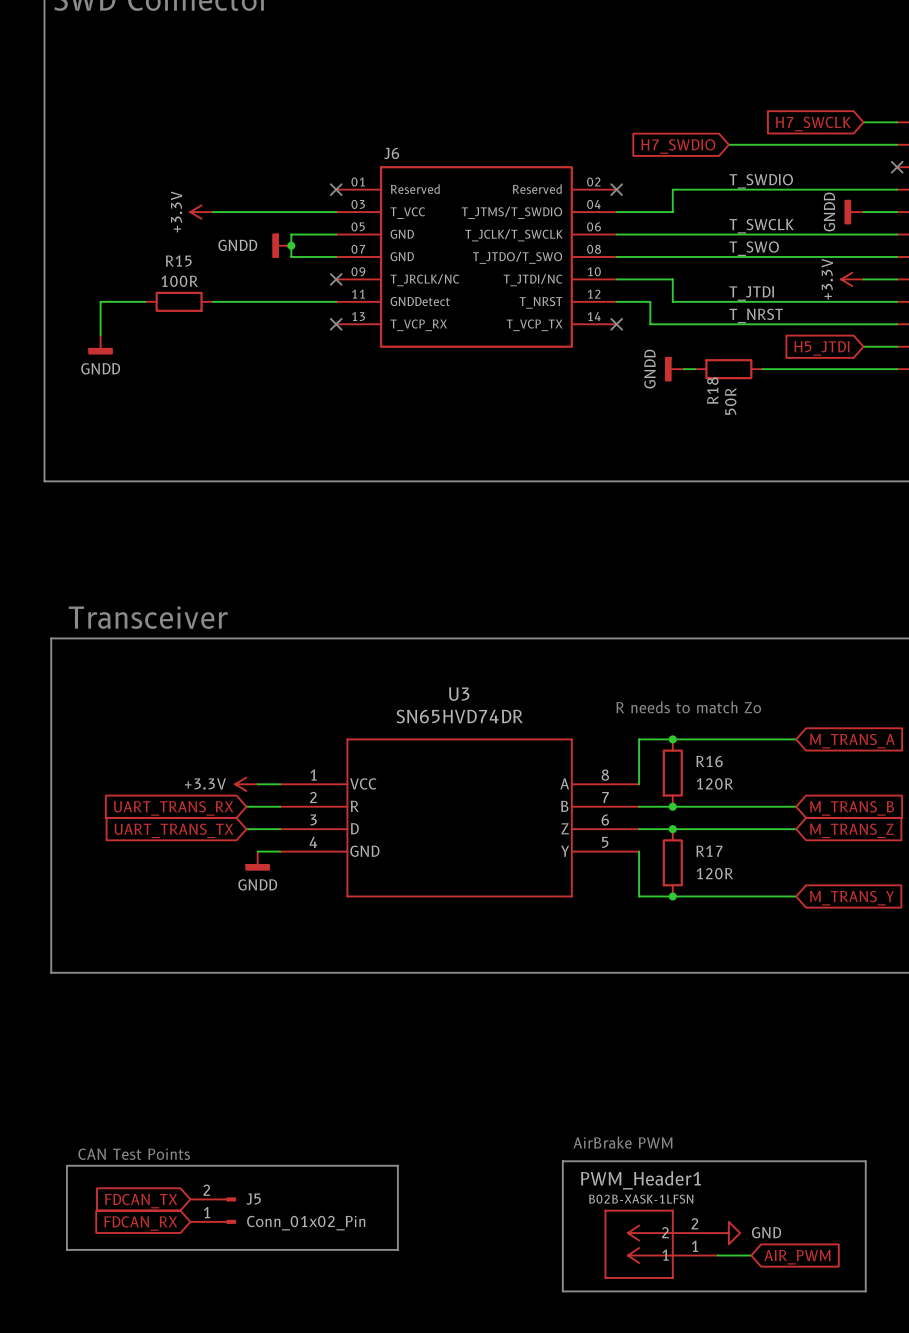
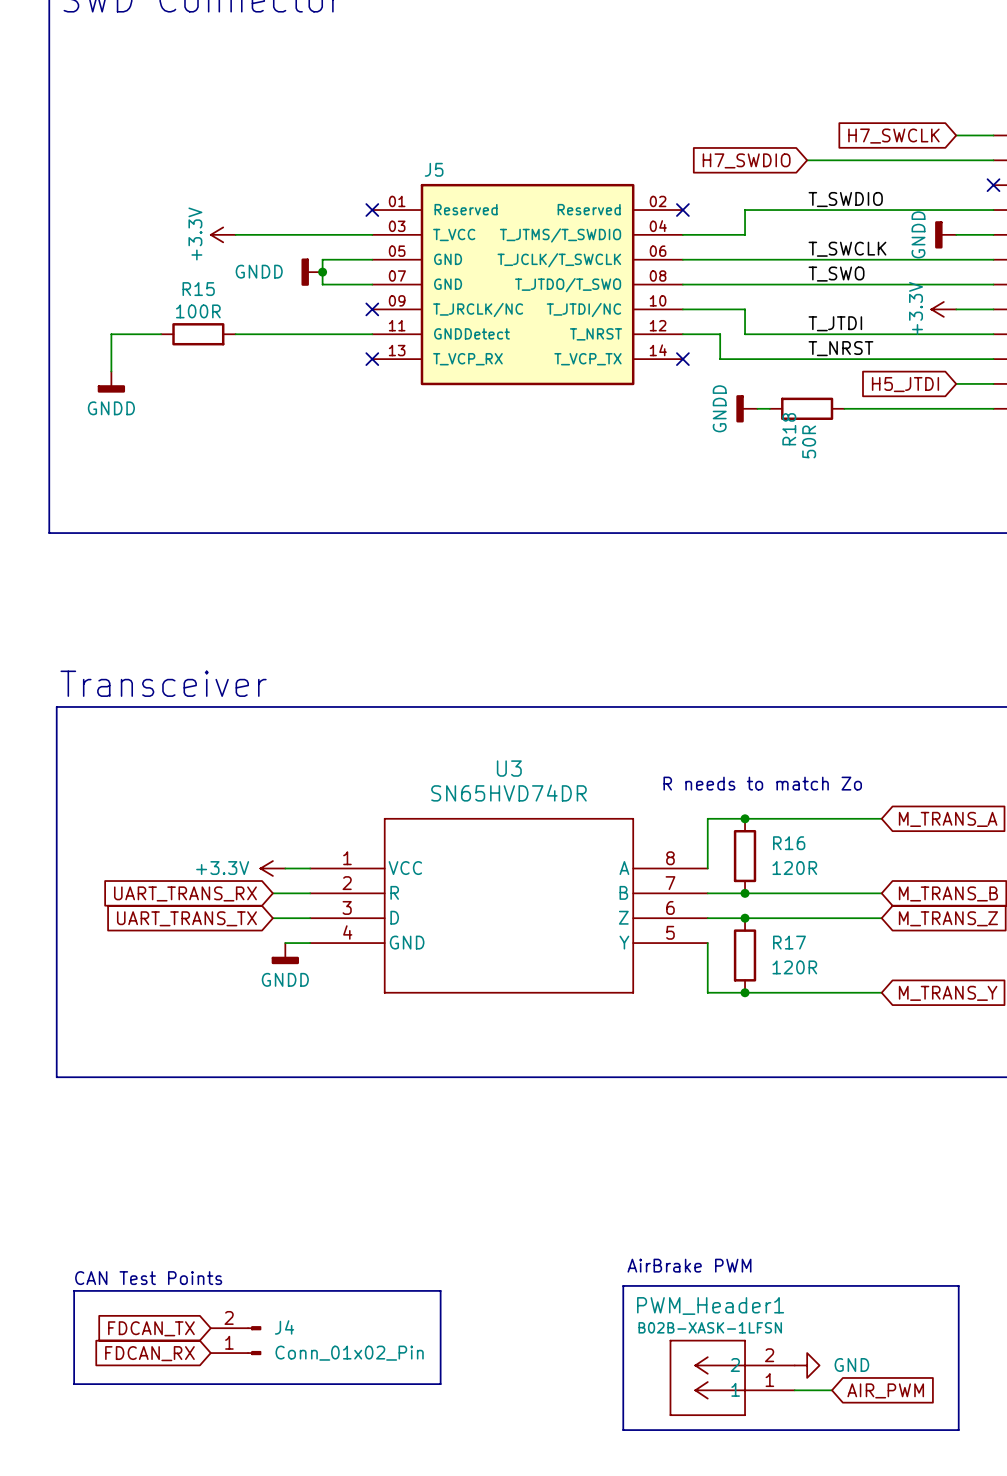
J6 name: J6 (391, 153) -> J5 (434, 169)
J5 name: J5 (253, 1199) -> J4 (284, 1327)

